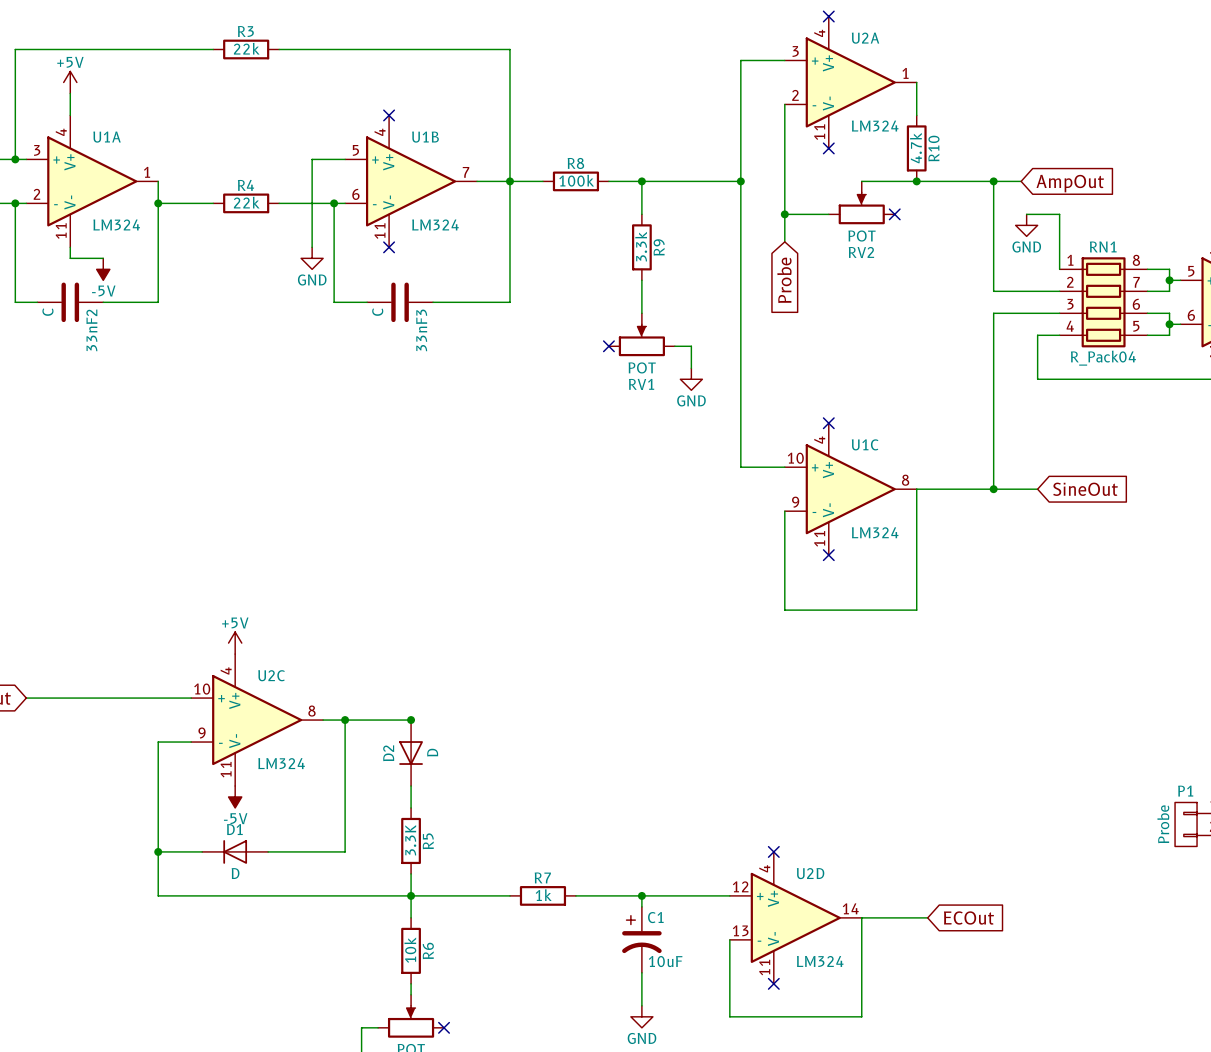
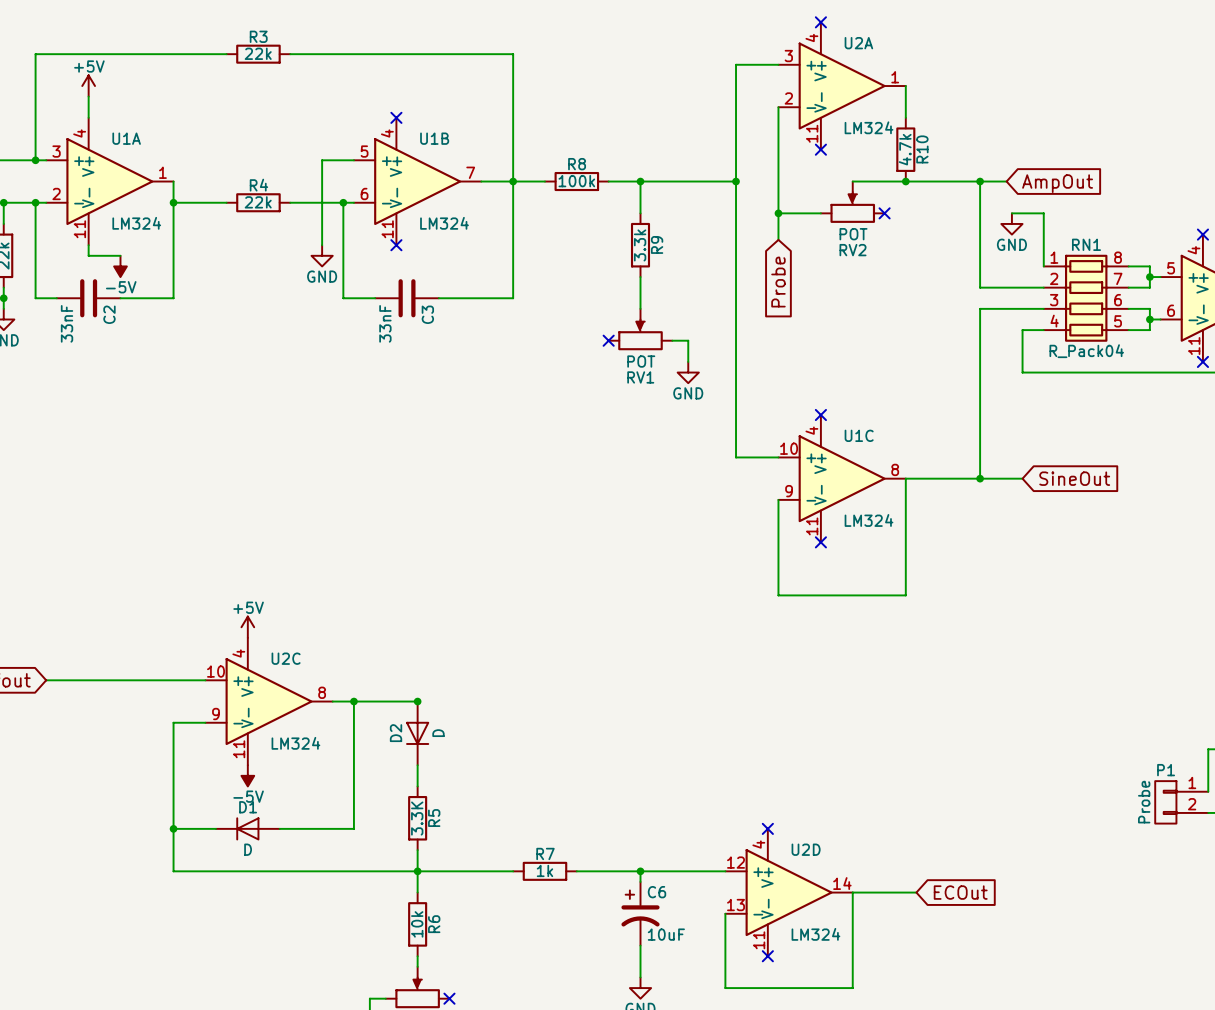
33nF2 value: C (47, 312) -> 33nF (67, 323)
33nF3 value: C (377, 312) -> 33nF (385, 323)
33nF2 name: 33nF2 (91, 330) -> C2 (109, 314)
33nF3 name: 33nF3 (421, 330) -> C3 (427, 314)
C1 name: C1 (655, 917) -> C6 (657, 892)

